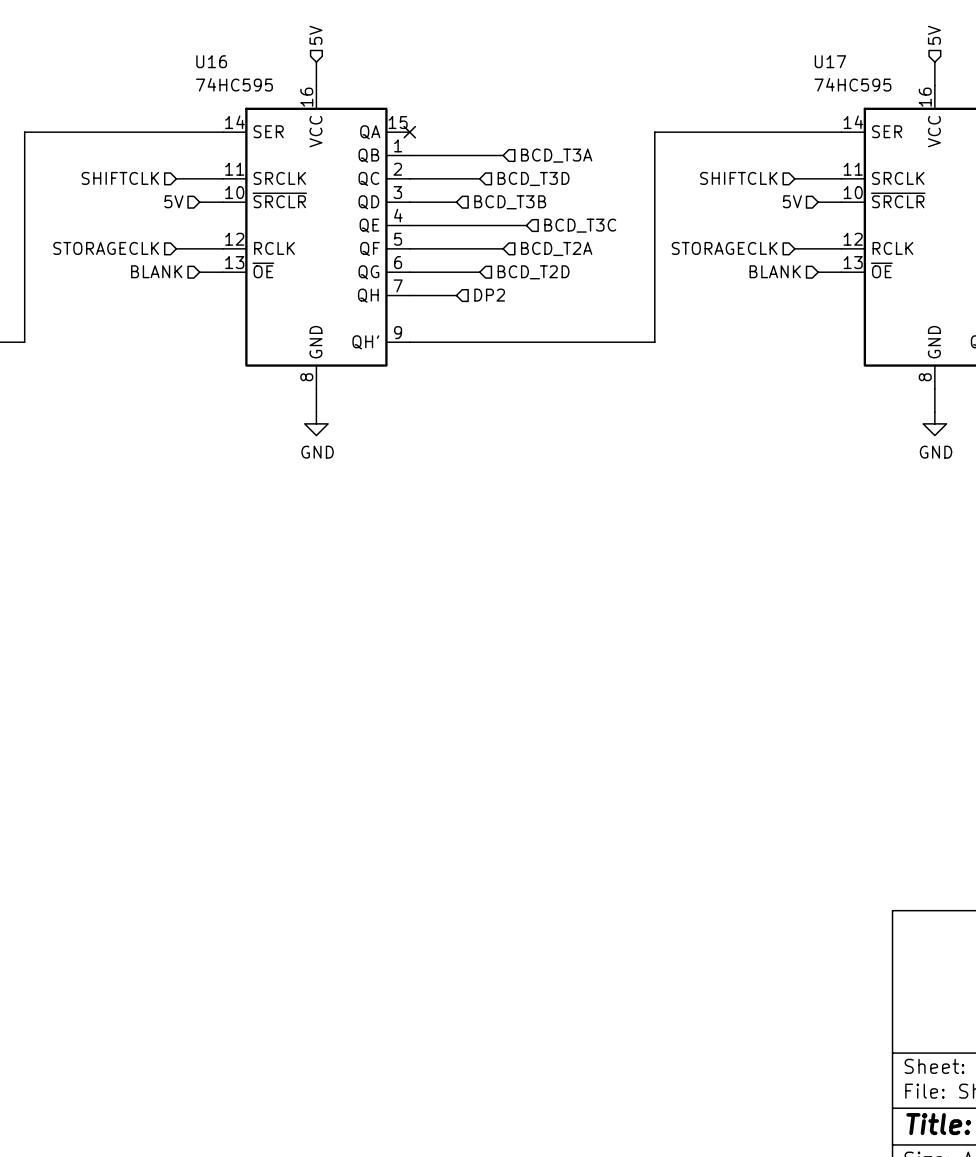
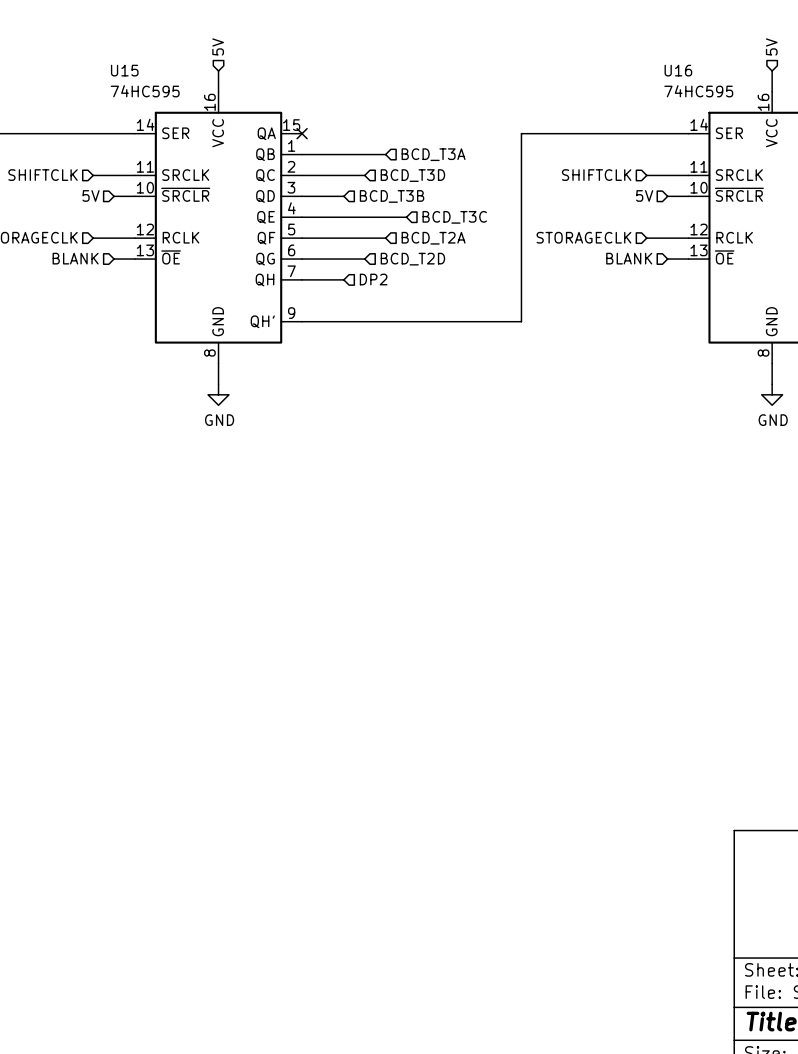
U16 name: U16 (211, 61) -> U15 (124, 70)
U17 name: U17 (830, 61) -> U16 (678, 70)

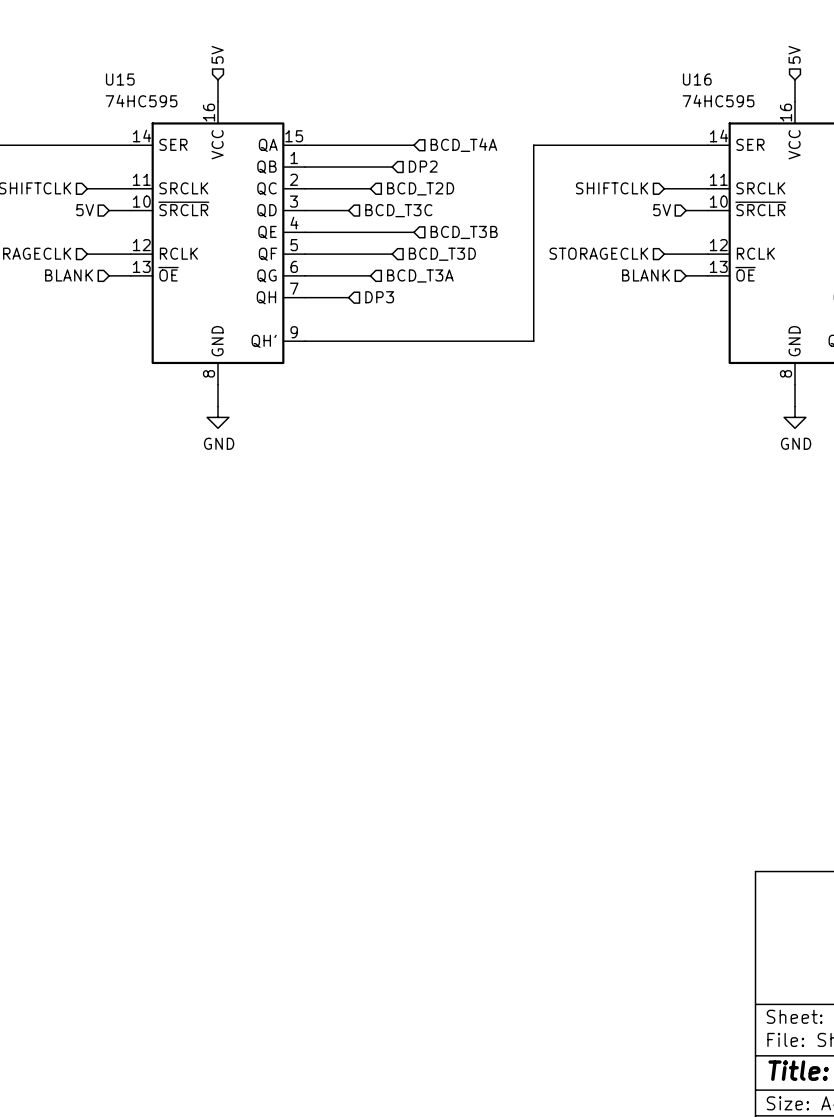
wire: none -> (305, 145) (413, 145)
no-connect mark: (302, 133) -> none
hierarchical label: none -> BCD_T4A (463, 145)
hierarchical label: BCD_T3A (433, 154) -> DP2 (423, 166)
hierarchical label: BCD_T3D (412, 175) -> BCD_T2D (420, 188)
hierarchical label: BCD_T3B (392, 196) -> BCD_T3C (398, 210)
hierarchical label: BCD_T3C (454, 217) -> BCD_T3B (464, 232)
hierarchical label: BCD_T2A (433, 238) -> BCD_T3D (442, 254)
hierarchical label: BCD_T2D (412, 259) -> BCD_T3A (420, 275)
hierarchical label: DP2 (373, 279) -> DP3 (379, 297)

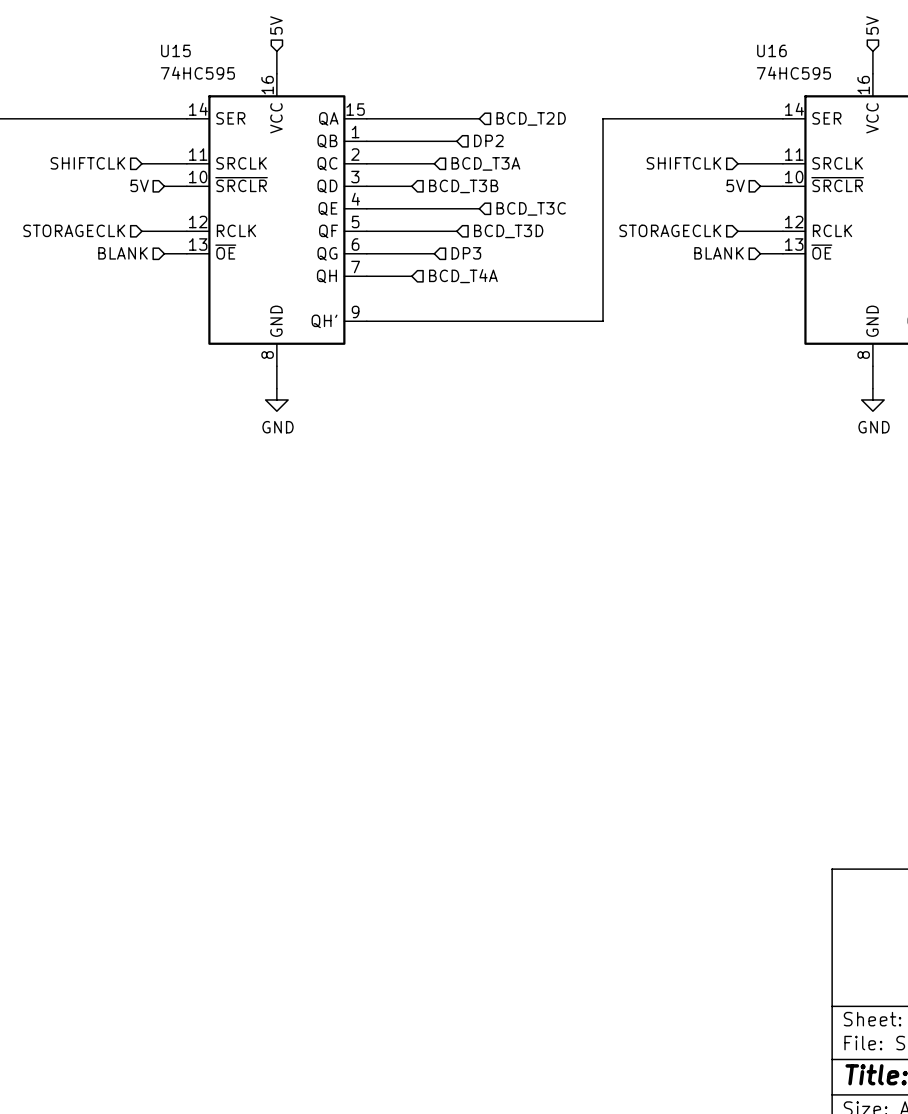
hierarchical label: BCD_T4A (463, 145) -> BCD_T2D (531, 118)
hierarchical label: BCD_T2D (420, 188) -> BCD_T3A (485, 163)
hierarchical label: BCD_T3C (398, 210) -> BCD_T3B (463, 186)
hierarchical label: BCD_T3B (464, 232) -> BCD_T3C (531, 208)
hierarchical label: BCD_T3A (420, 275) -> DP3 (466, 253)
hierarchical label: DP3 (379, 297) -> BCD_T4A (463, 276)

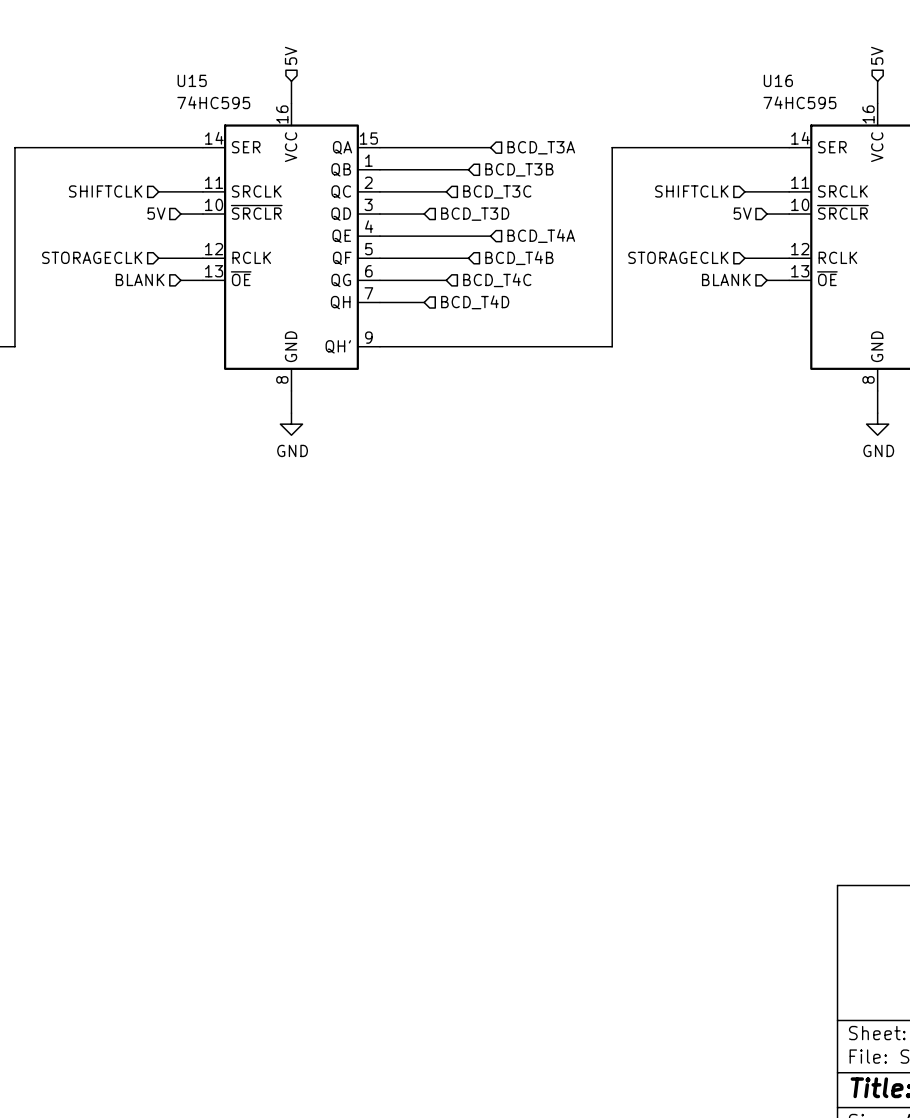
hierarchical label: BCD_T2D (531, 118) -> BCD_T3A (541, 147)
hierarchical label: DP2 (488, 140) -> BCD_T3B (519, 169)
hierarchical label: BCD_T3A (485, 163) -> BCD_T3C (497, 192)
hierarchical label: BCD_T3B (463, 186) -> BCD_T3D (475, 214)
hierarchical label: BCD_T3C (531, 208) -> BCD_T4A (541, 235)
hierarchical label: BCD_T3D (508, 231) -> BCD_T4B (519, 258)
hierarchical label: DP3 (466, 253) -> BCD_T4C (497, 280)
hierarchical label: BCD_T4A (463, 276) -> BCD_T4D (475, 302)

